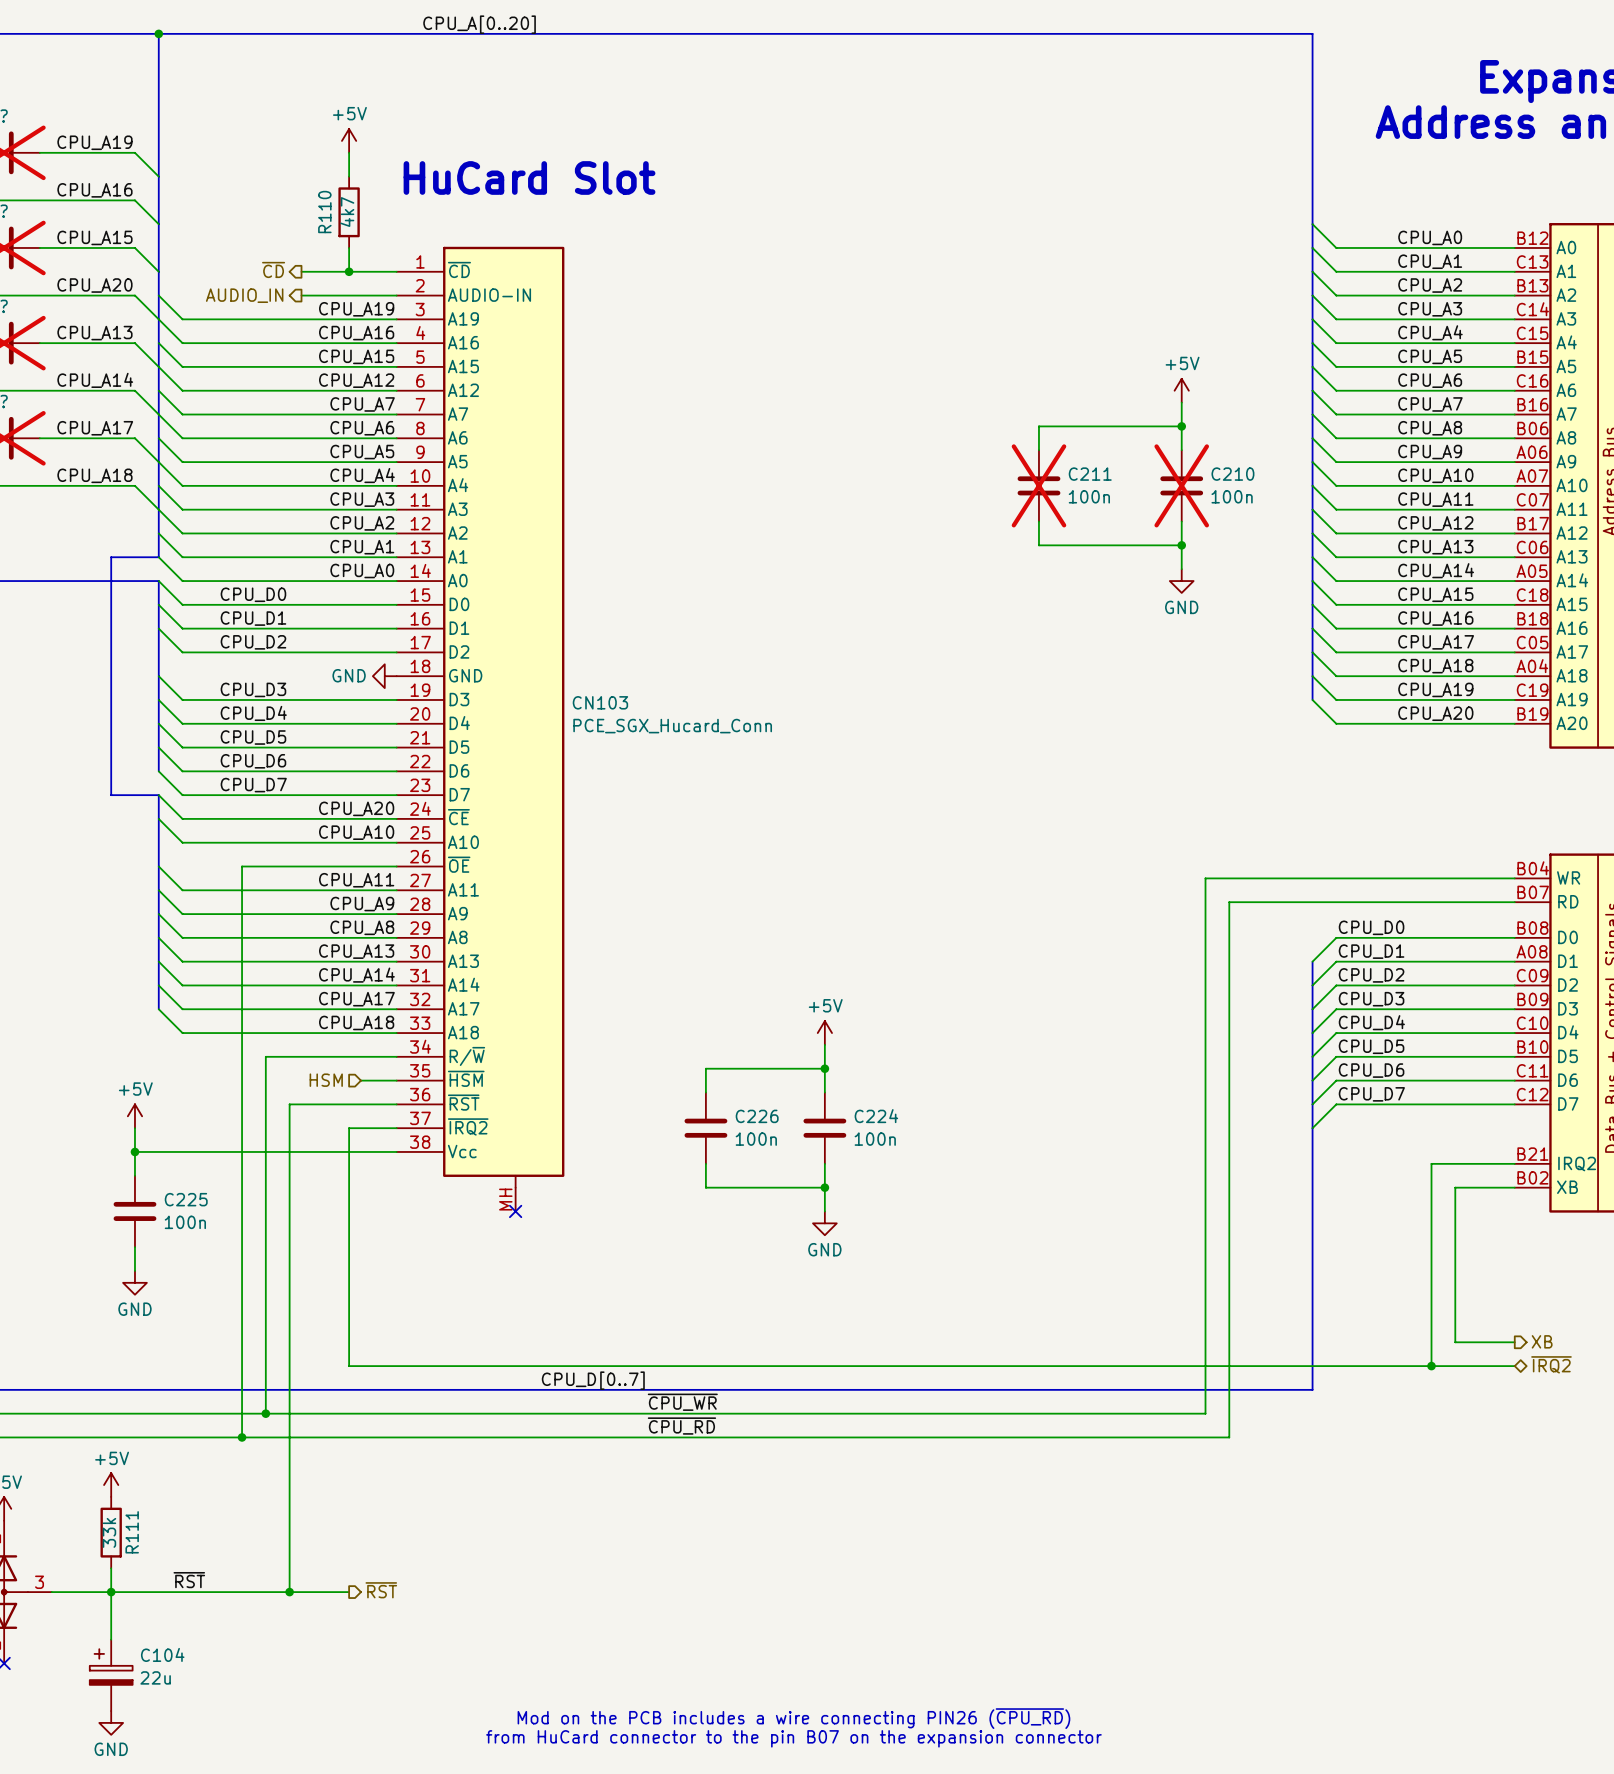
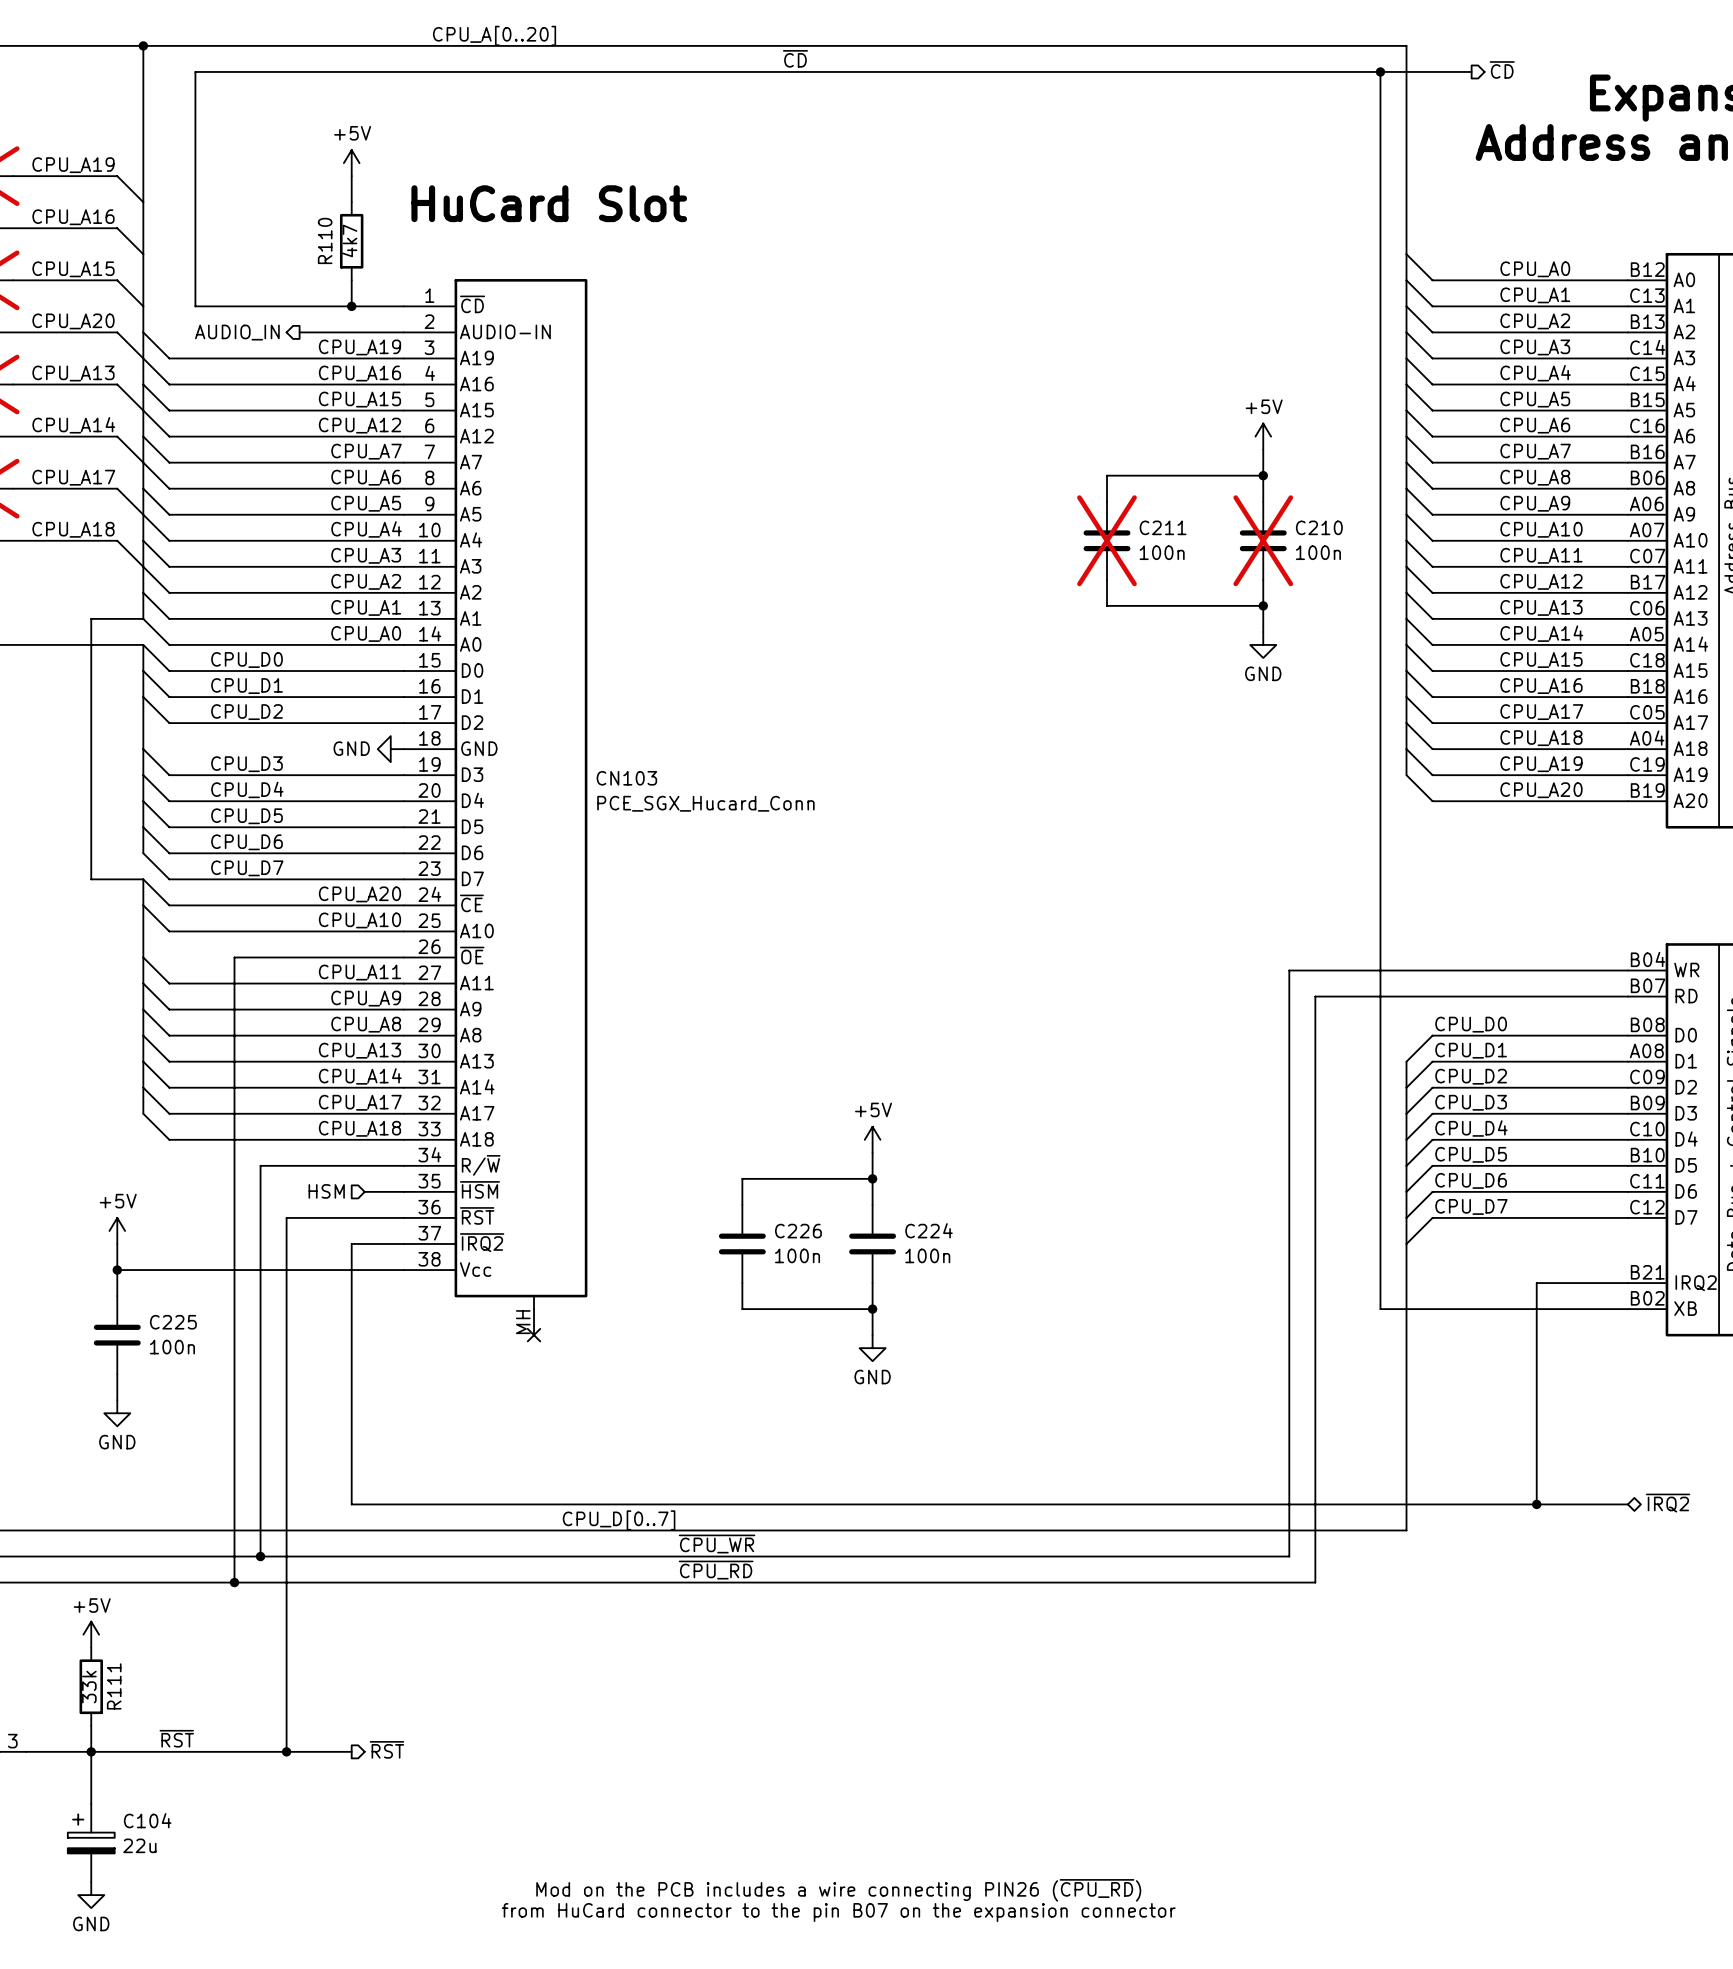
label: none -> ~{CD} (795, 58)
hierarchical label: none -> ~{CD} (1502, 69)
junction: none -> (1380, 71)
wire: none -> (1471, 71) (195, 71) (195, 306) (299, 306)
hierarchical label: ~{CD} (273, 269) -> none
wire: (1455, 1187) (1455, 1342) (1514, 1342) -> (1562, 1309) (1380, 1309) (1380, 71)
hierarchical label: XB (1542, 1341) -> none

